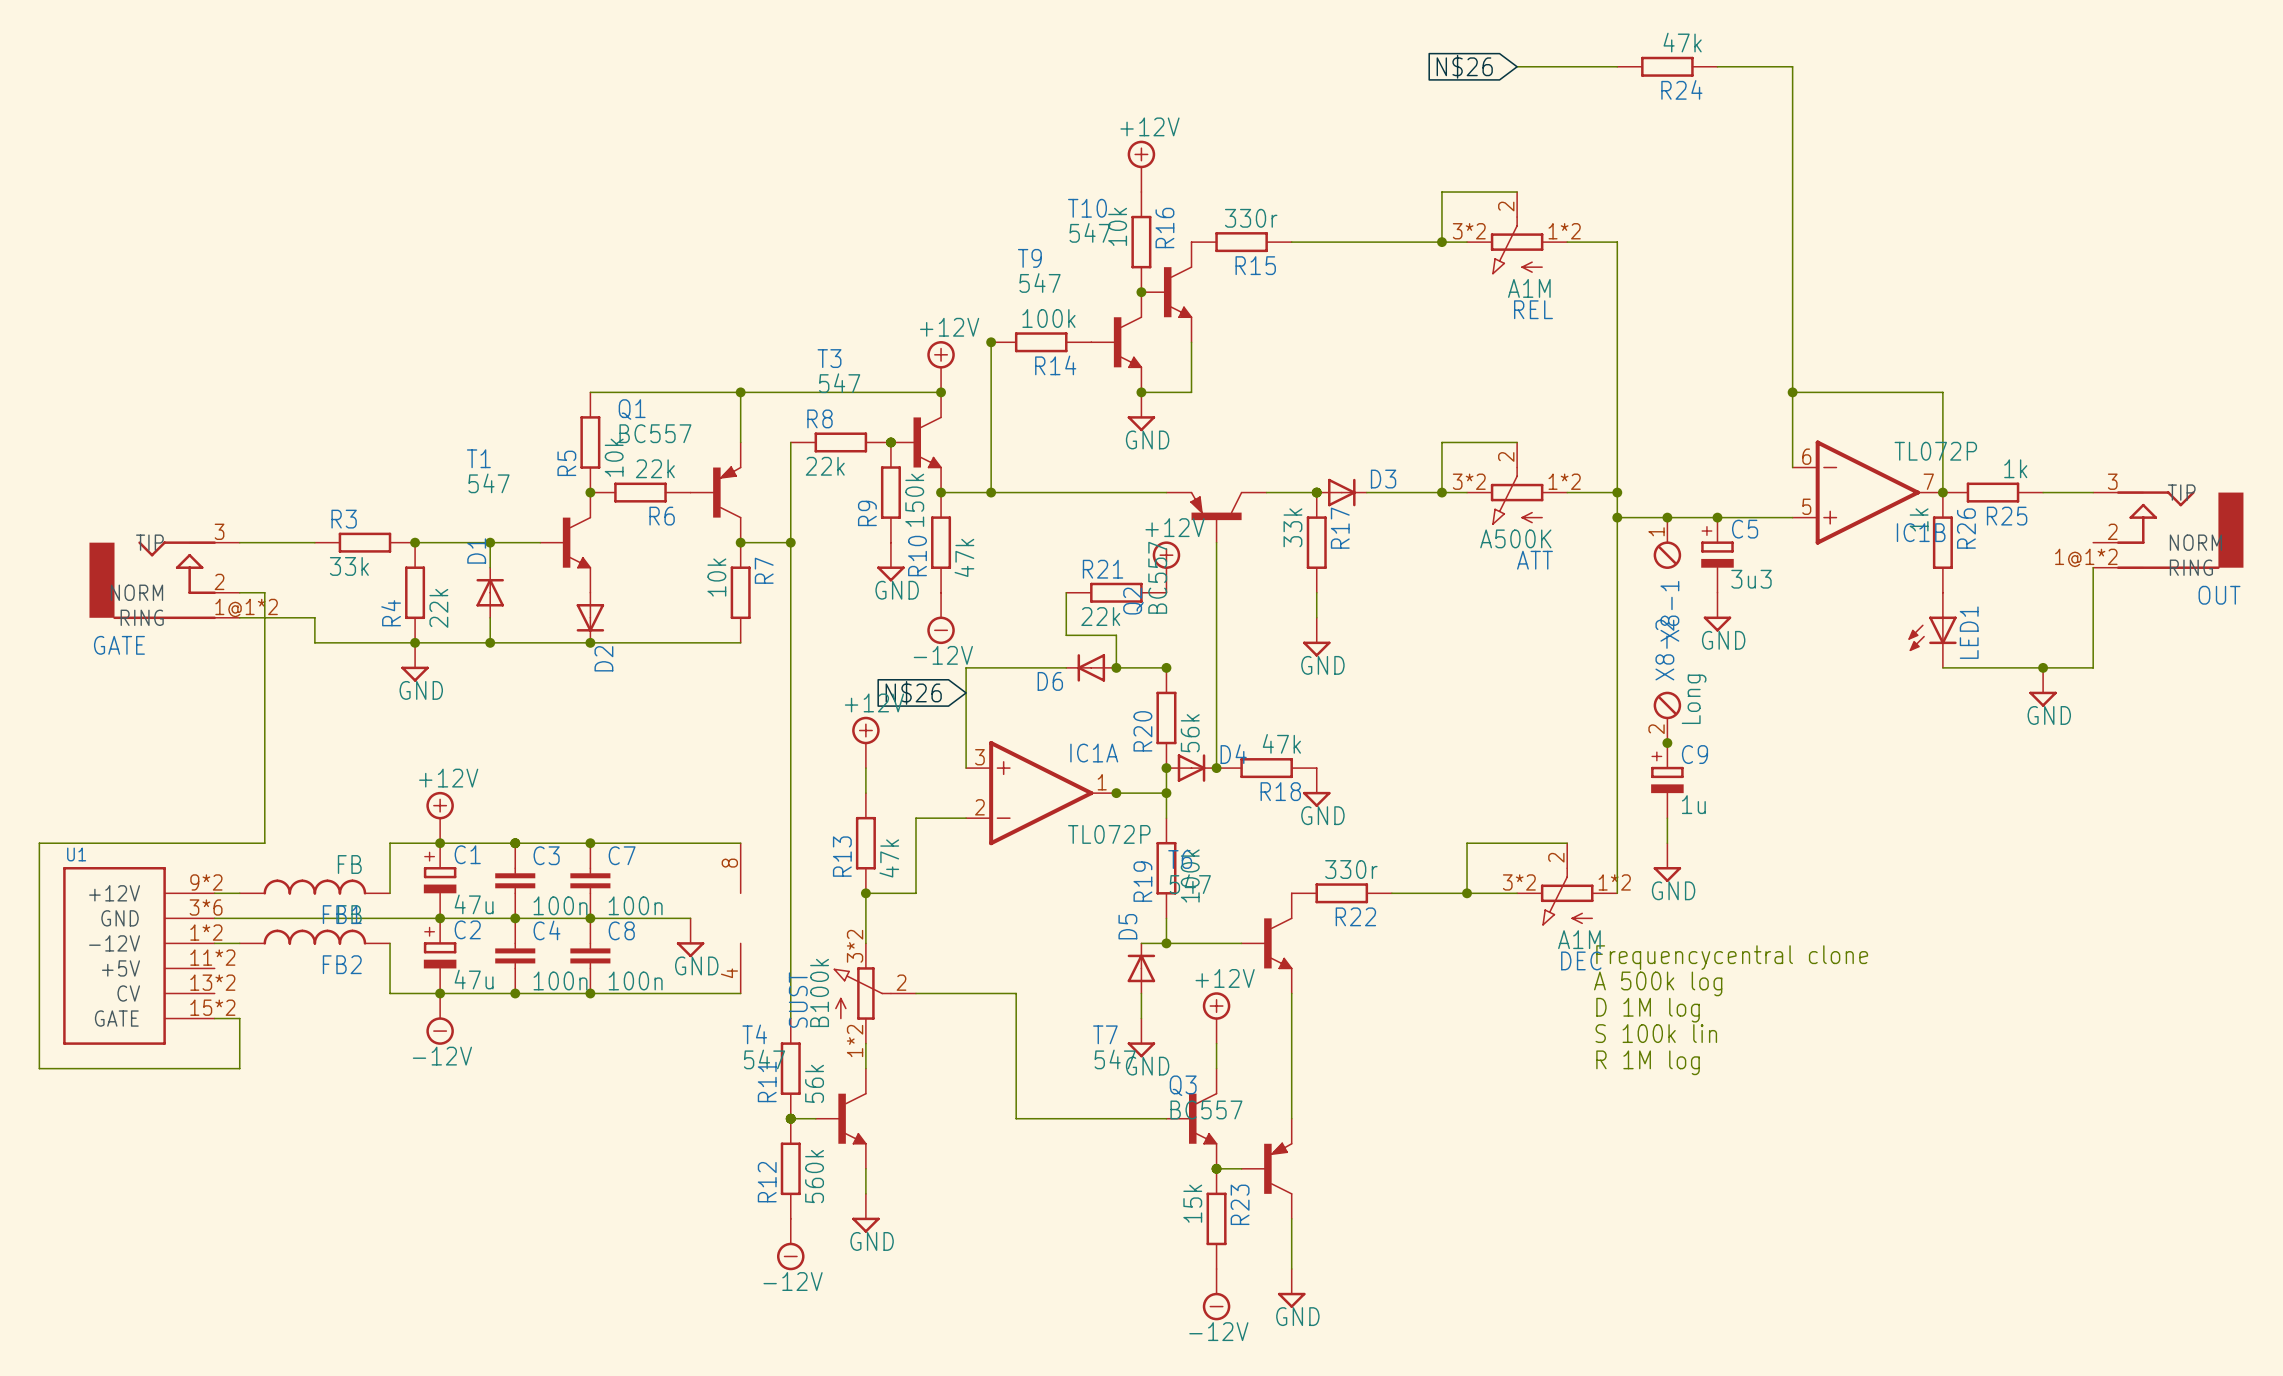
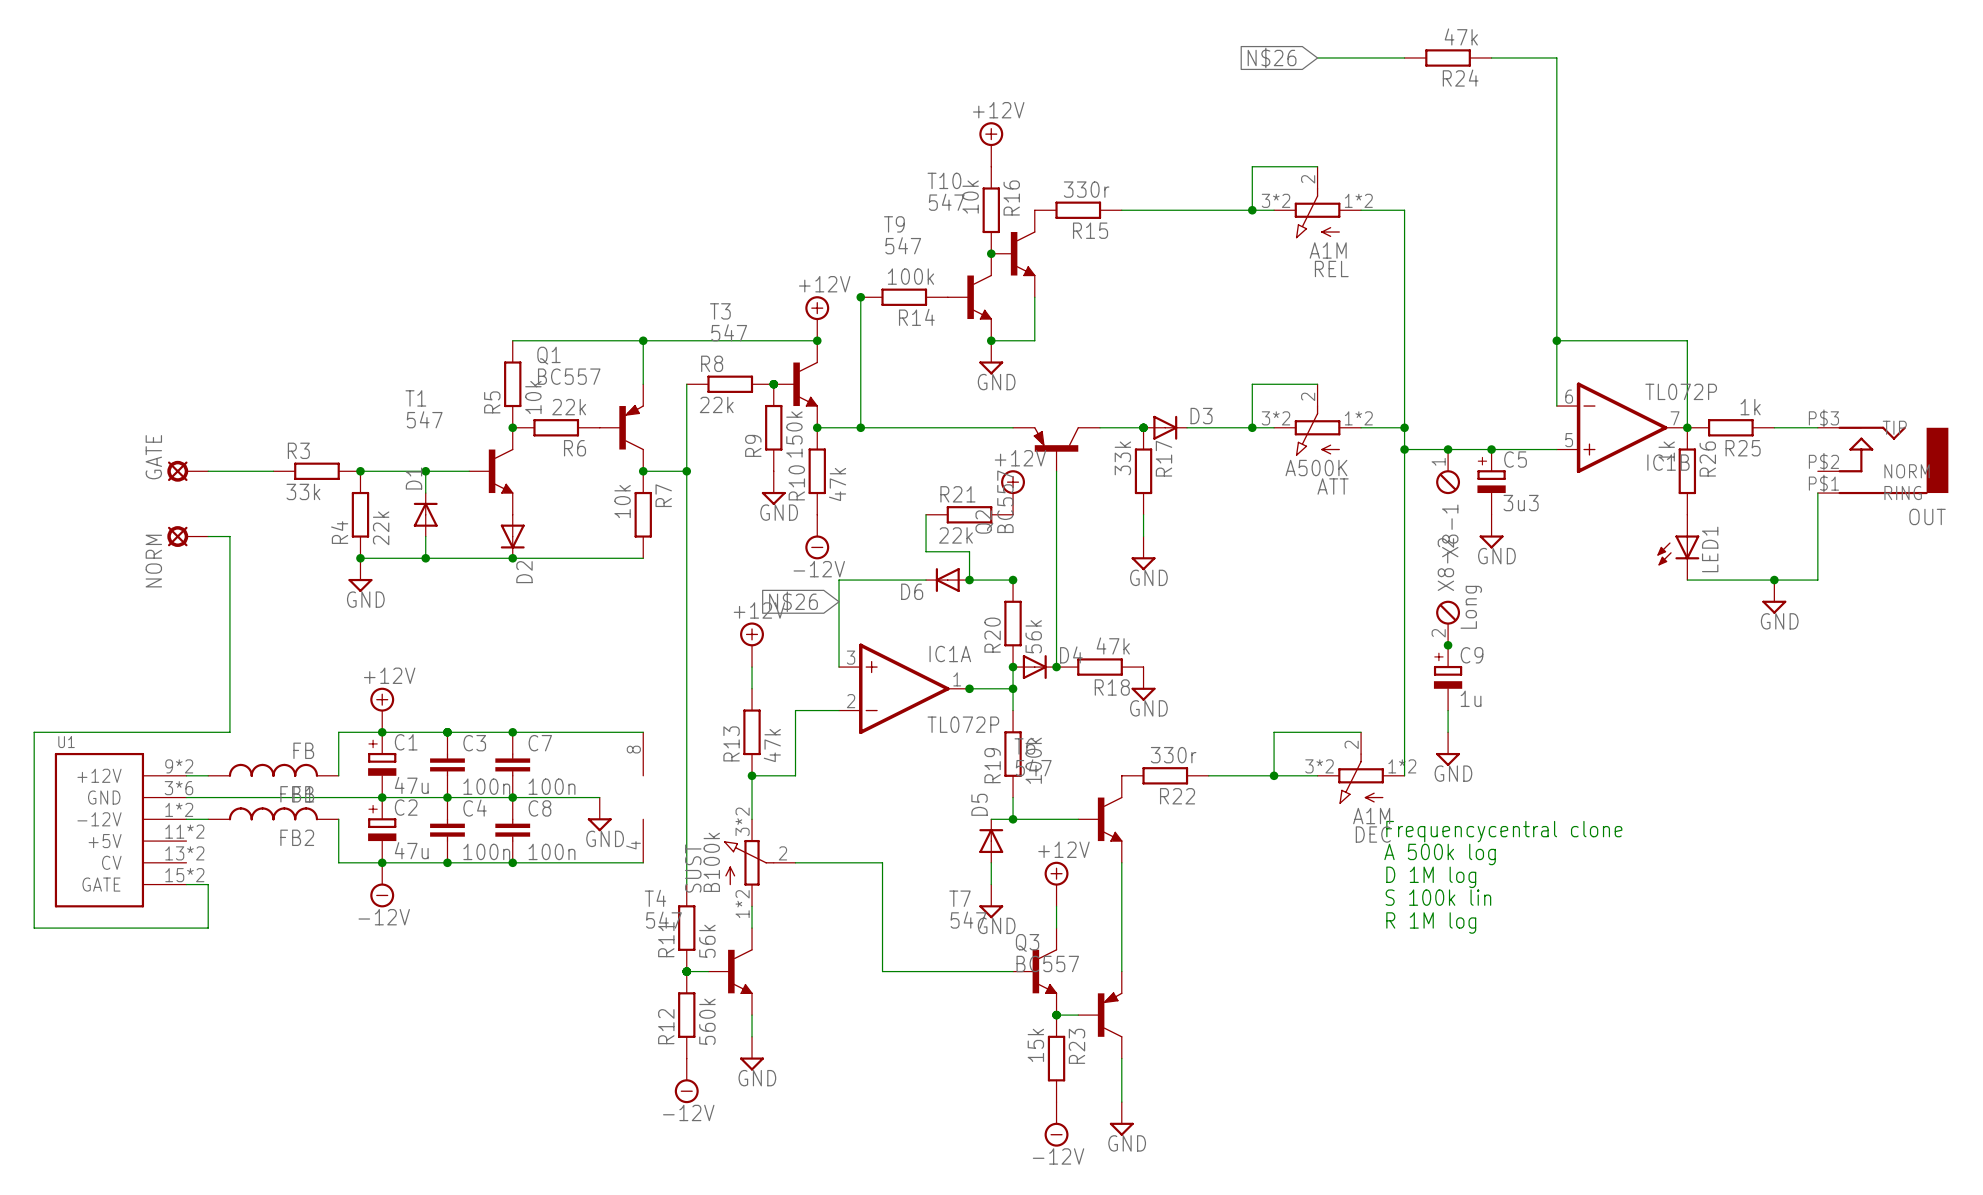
OUT pin number: 3 (2112, 481) -> P$3 (1823, 418)
OUT pin number: 2 (2112, 531) -> P$2 (1823, 461)
GATE: none -> (187, 471)
OUT pin number: 1@1*2 (2086, 557) -> P$1 (1823, 483)
GATE: (164, 580) -> none
wire: (239, 592) (264, 592) (264, 617) (314, 617) (314, 642) (415, 642) -> none
NORM: none -> (187, 536)

